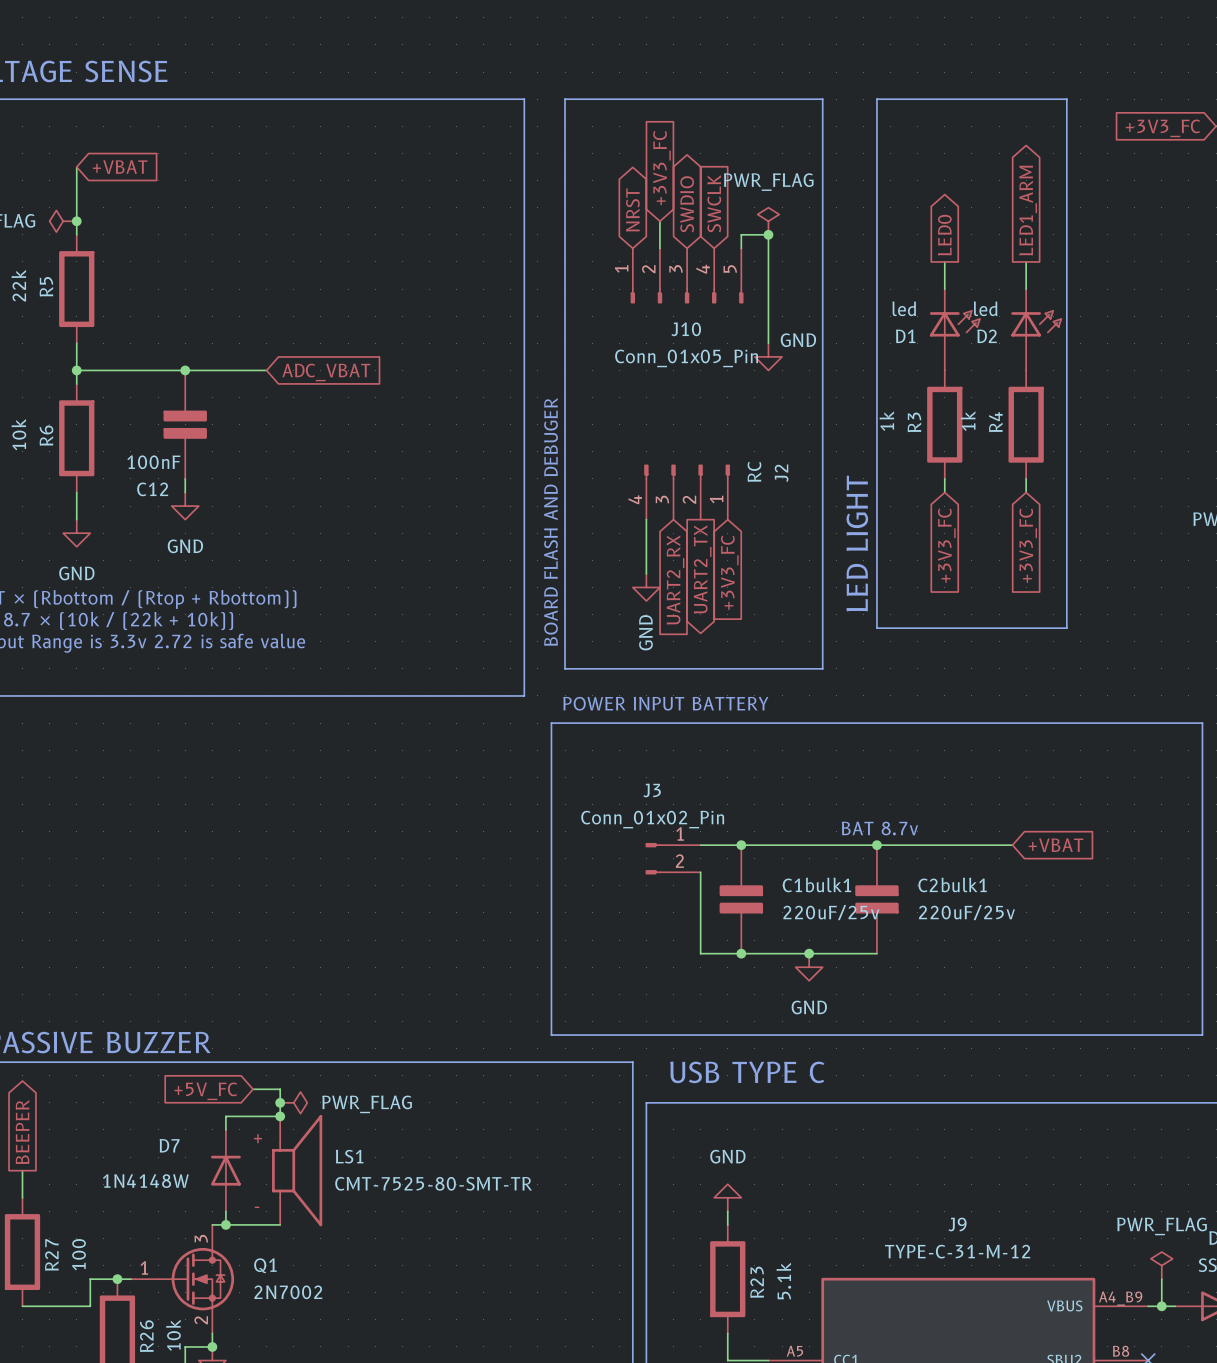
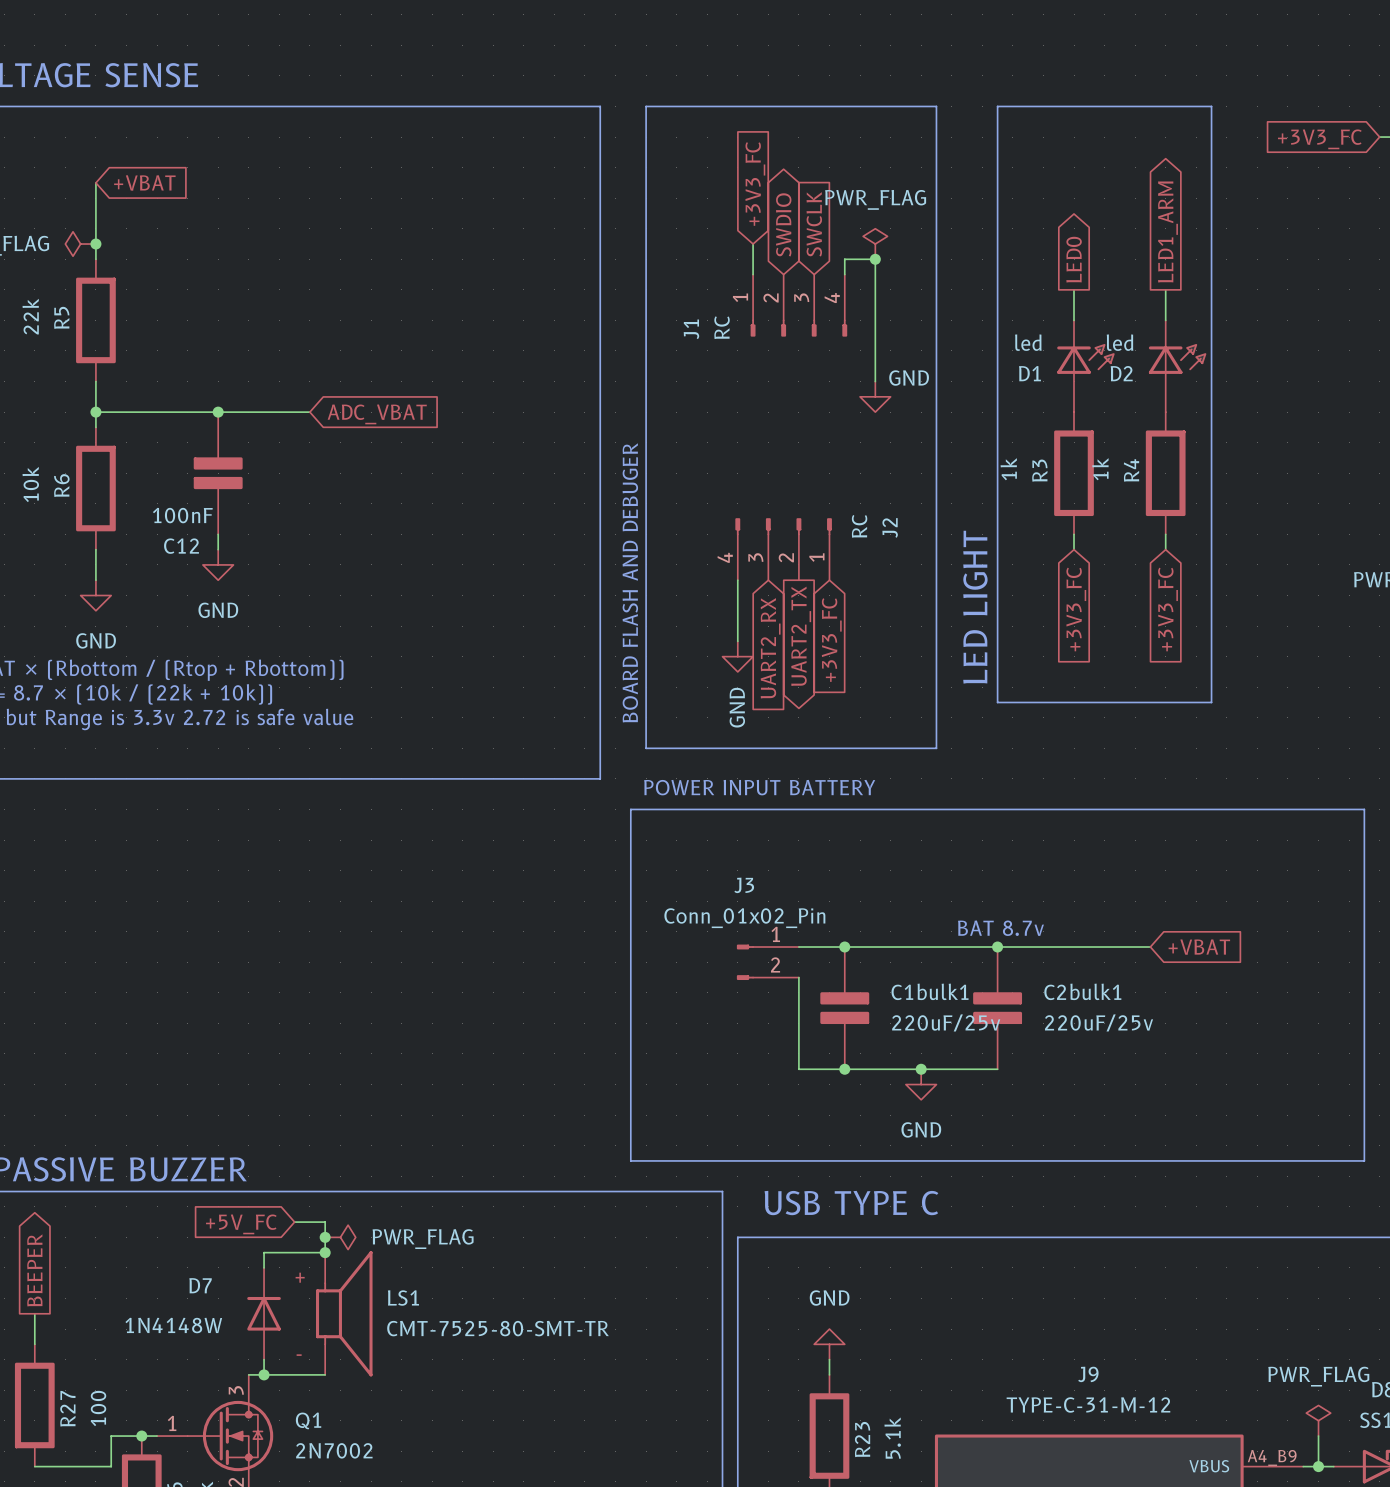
global label: NRST (632, 209) -> none
J10: Conn_01x05_Pin (687, 275) -> none
J1: none -> RC (798, 305)

